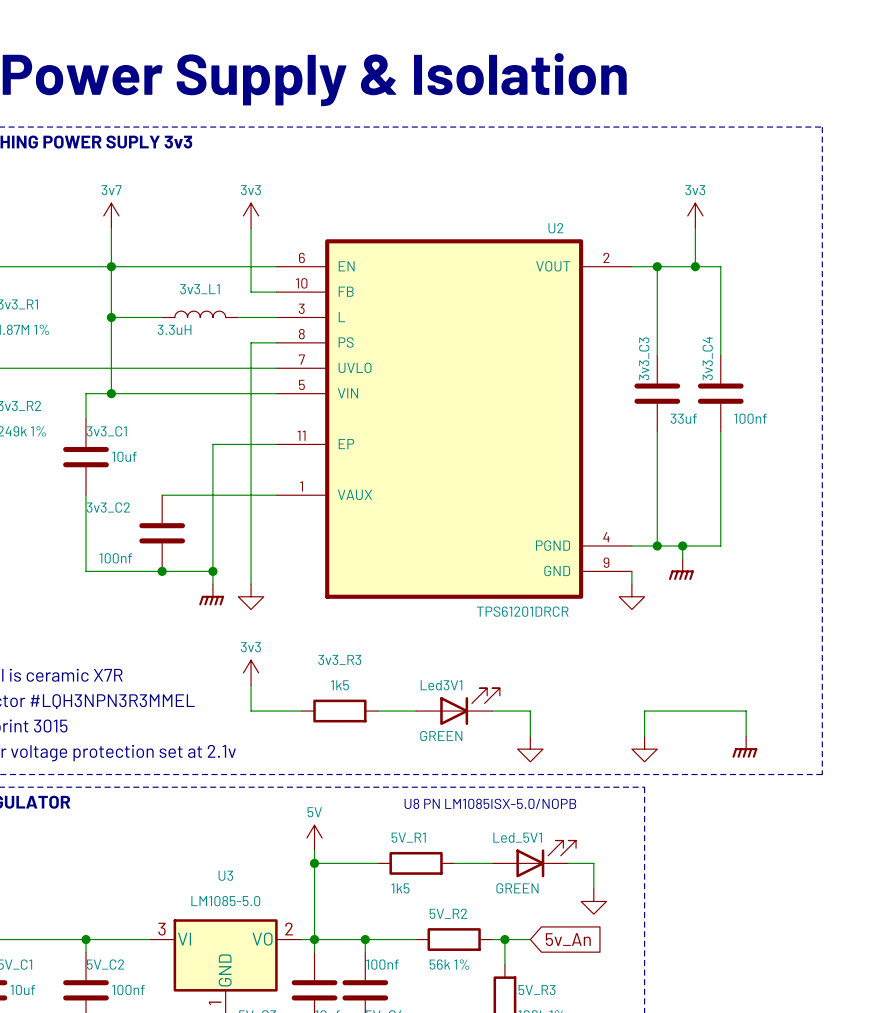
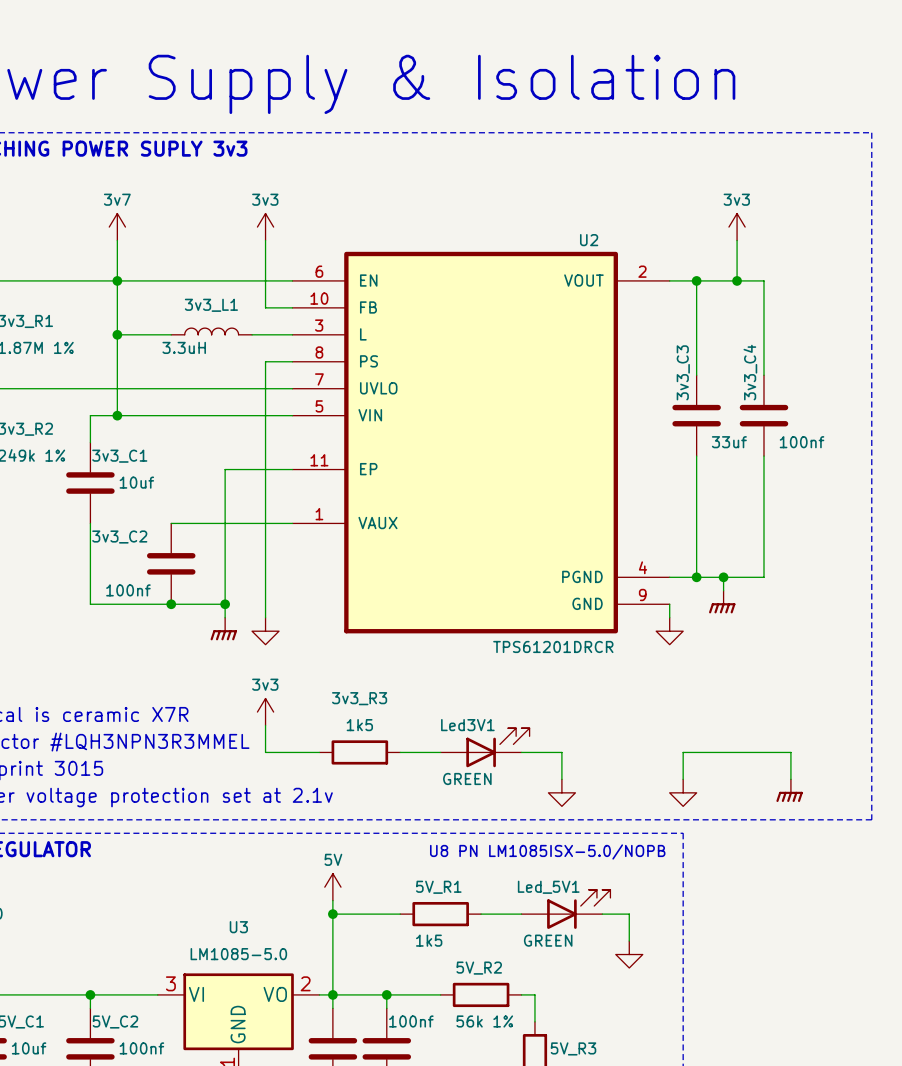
wire: (504, 939) (530, 939) -> none
junction: (504, 939) -> none
global label: 5v_An (568, 939) -> none

